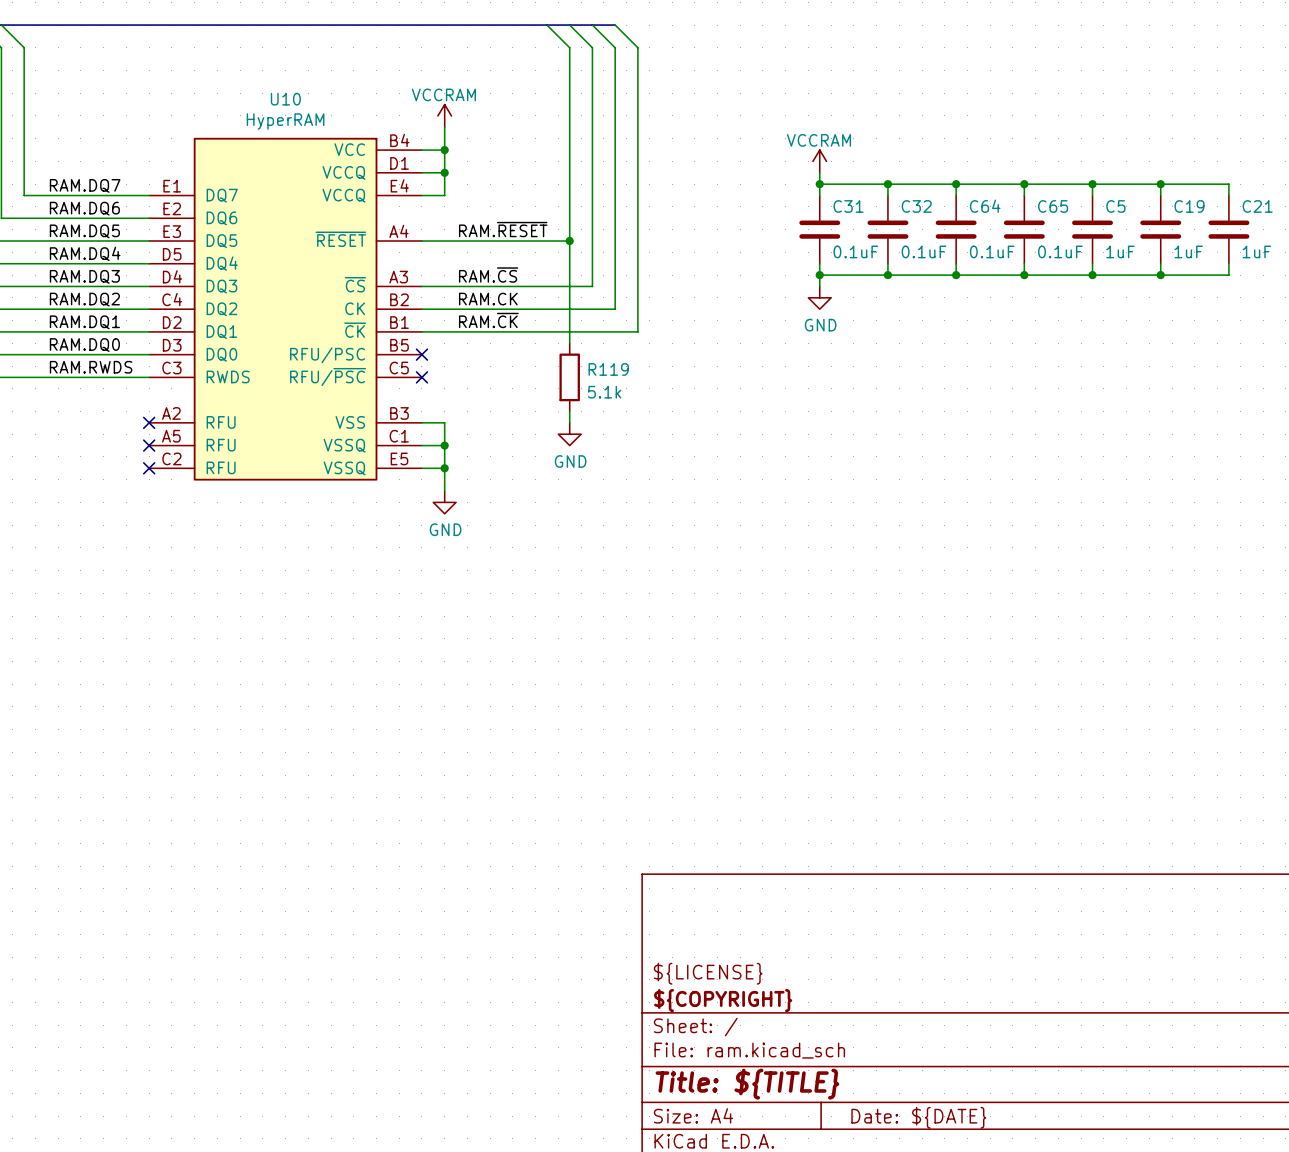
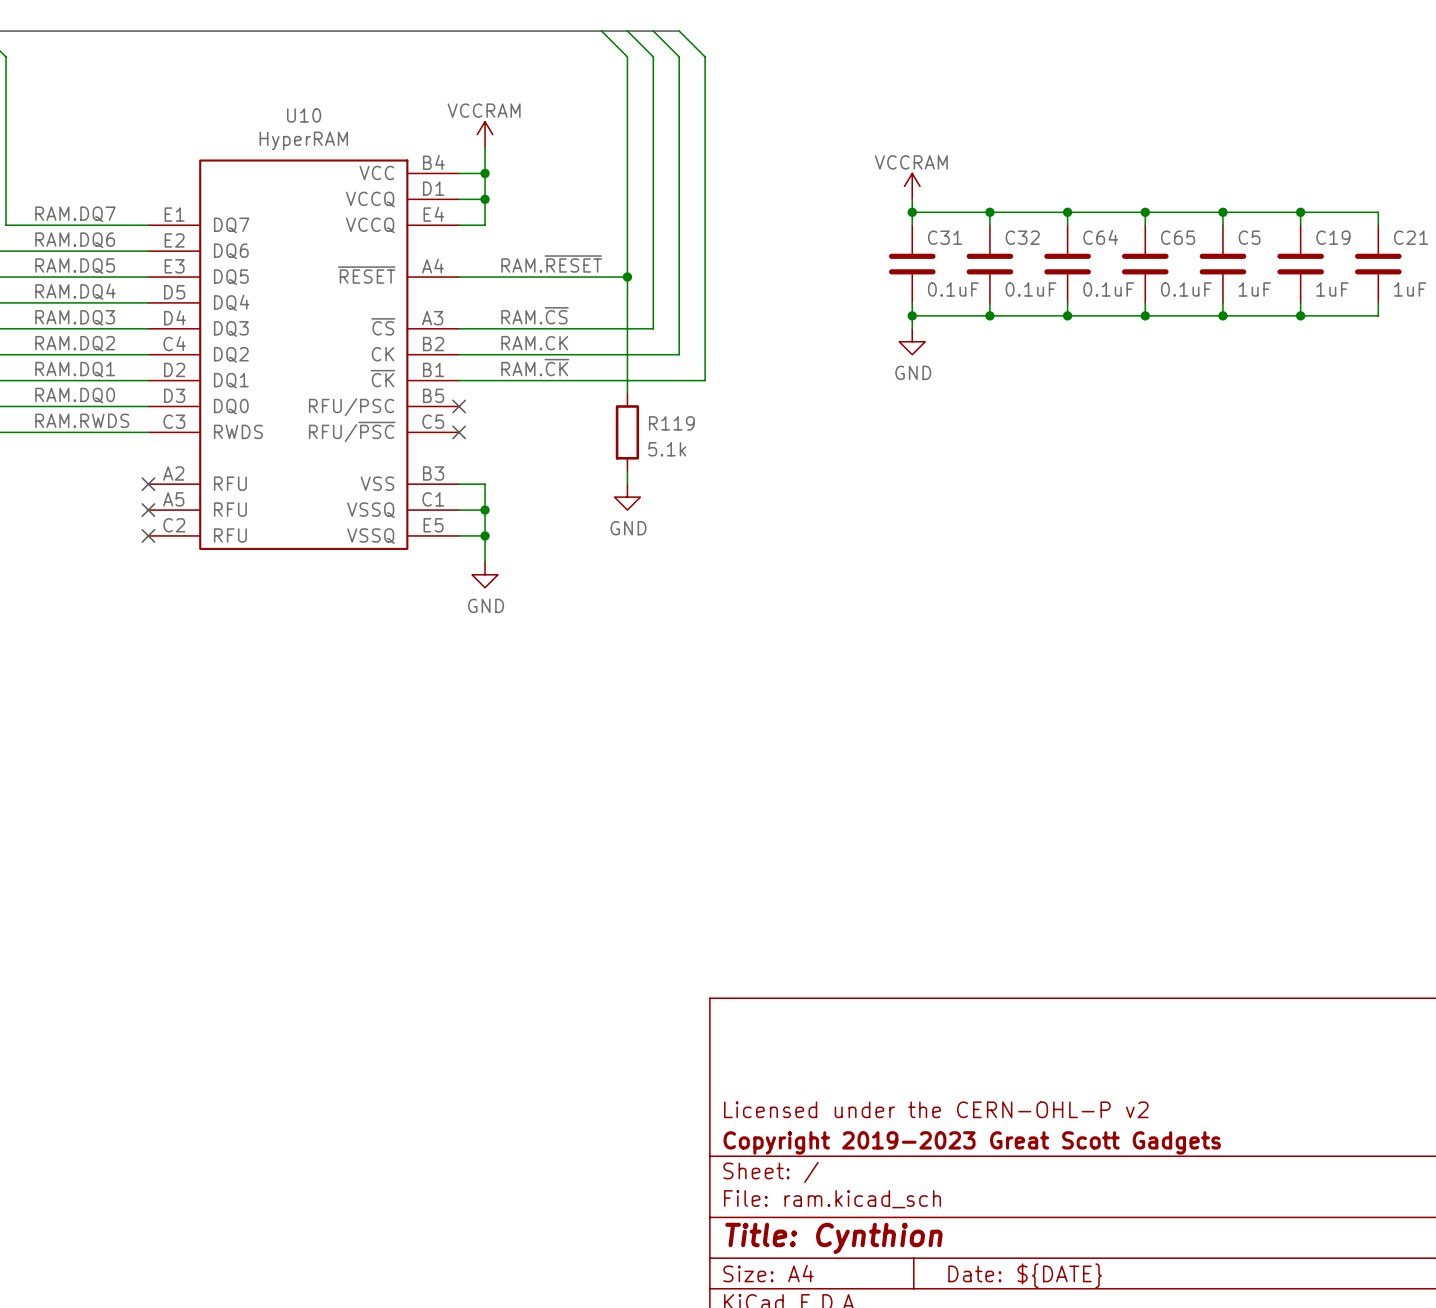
title block: ${LICENSE} (708, 973) -> Licensed under the CERN-OHL-P v2 (936, 1109)
title block: ${COPYRIGHT} (723, 1000) -> Copyright 2019-2023 Great Scott Gadgets (972, 1142)
title block: Title: ${TITLE} (747, 1084) -> Title: Cynthion (833, 1238)

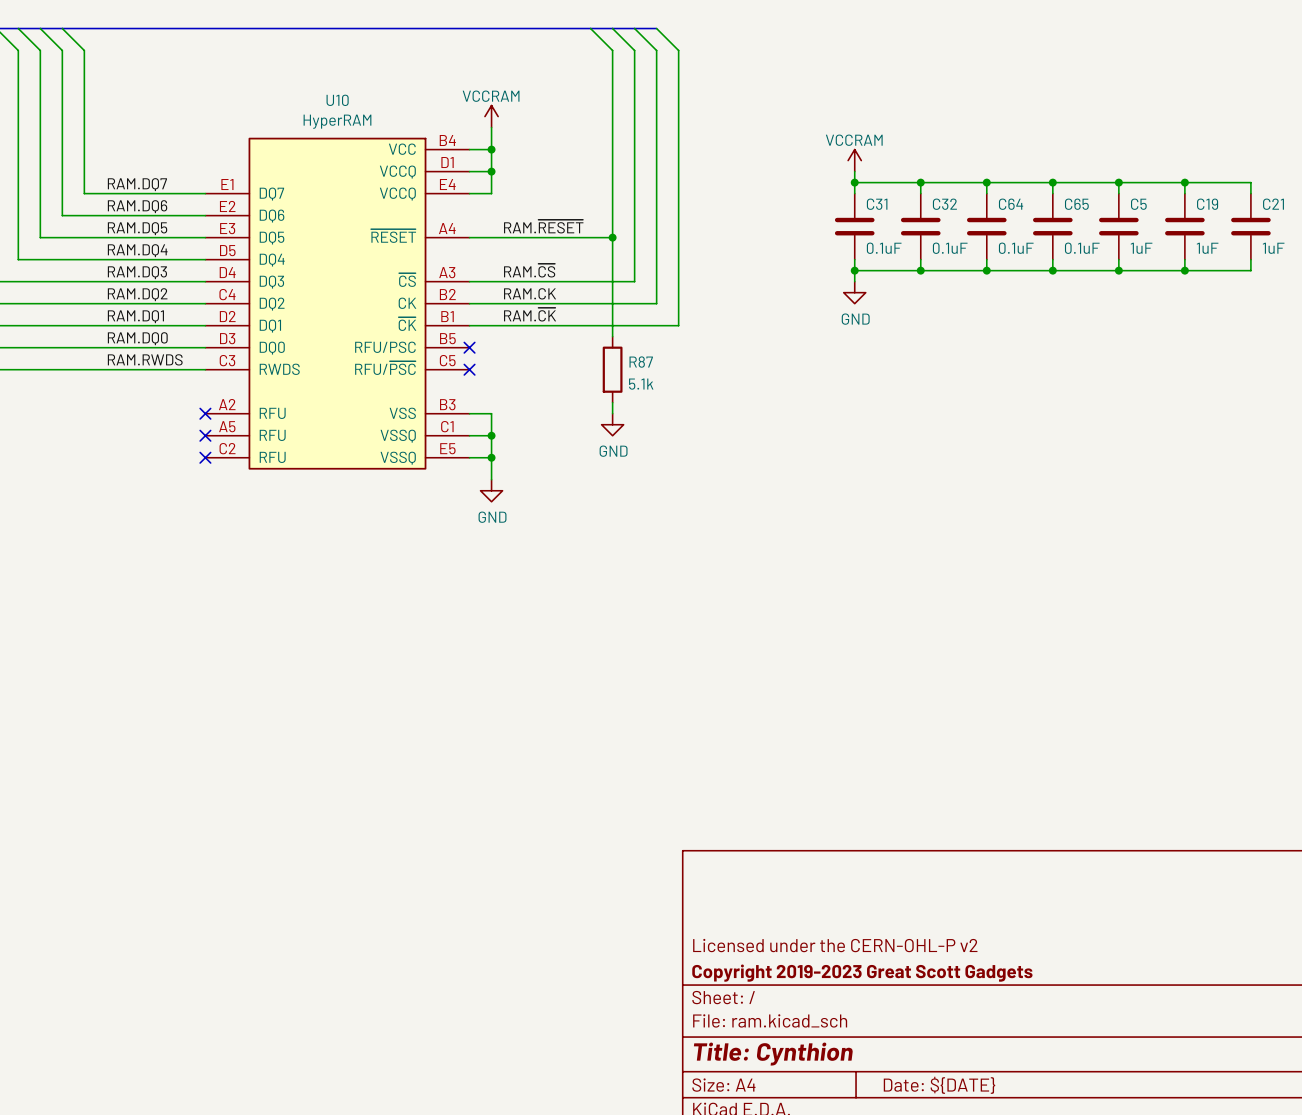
R119 name: R119 (671, 423) -> R87 (641, 362)

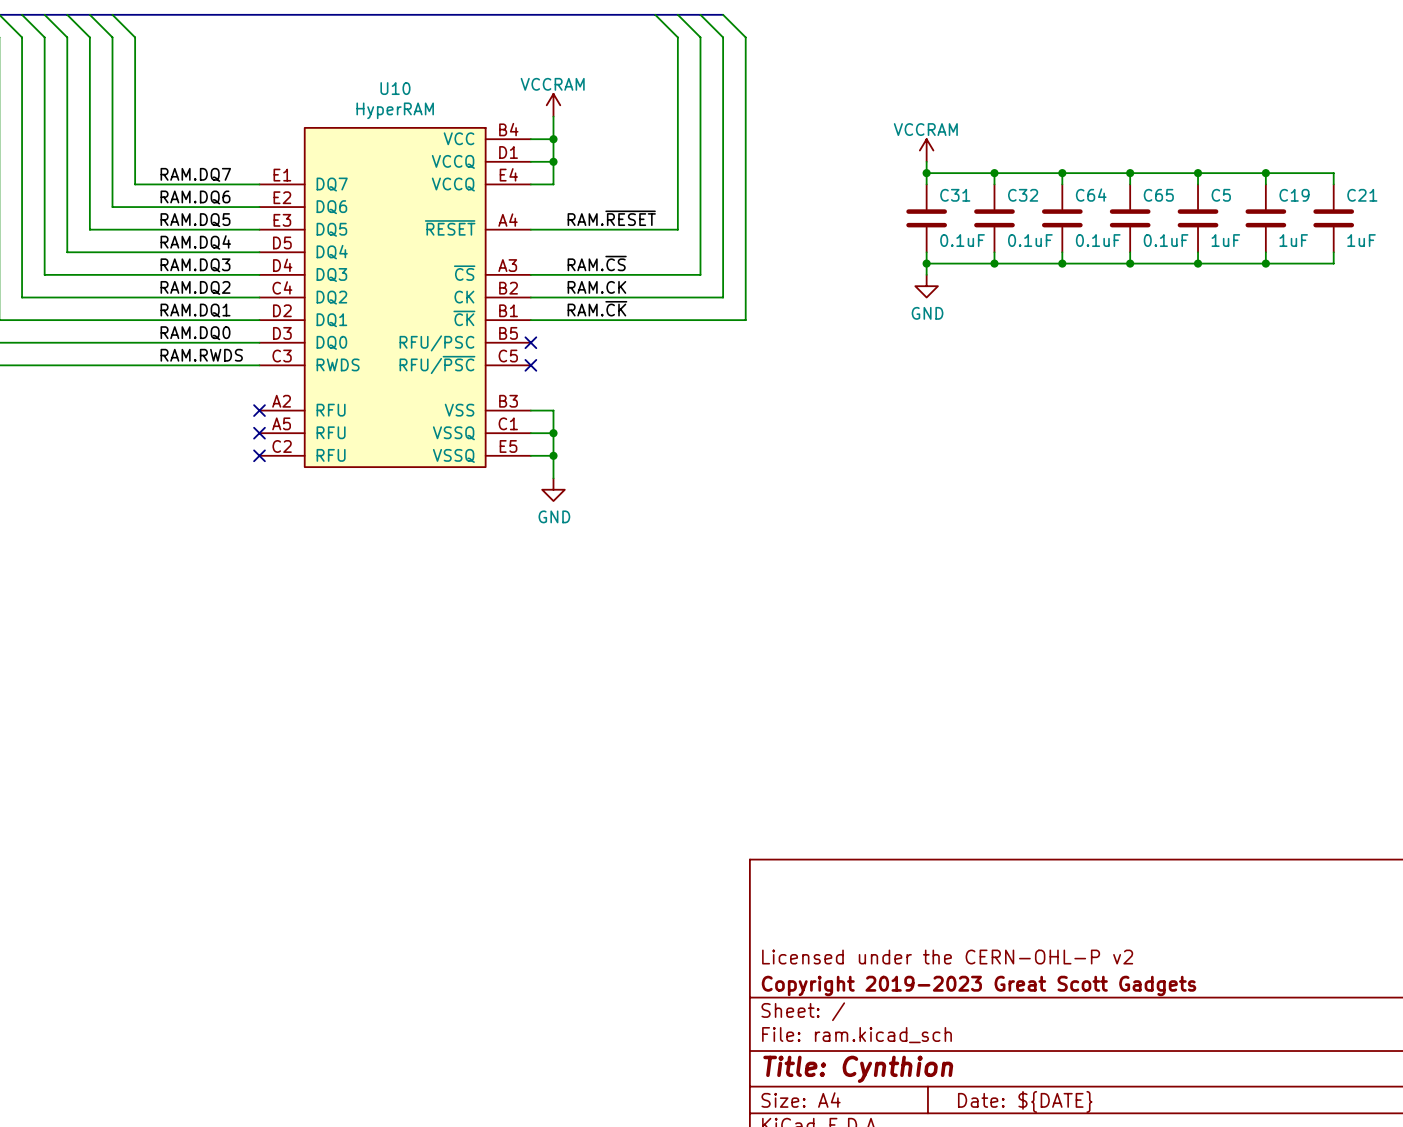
wire: (612, 237) (612, 336) -> none
junction: (612, 237) -> none
R87: 5.1k (612, 369) -> none
wire: (612, 402) (612, 413) -> none
power symbol: GND (612, 424) -> none

